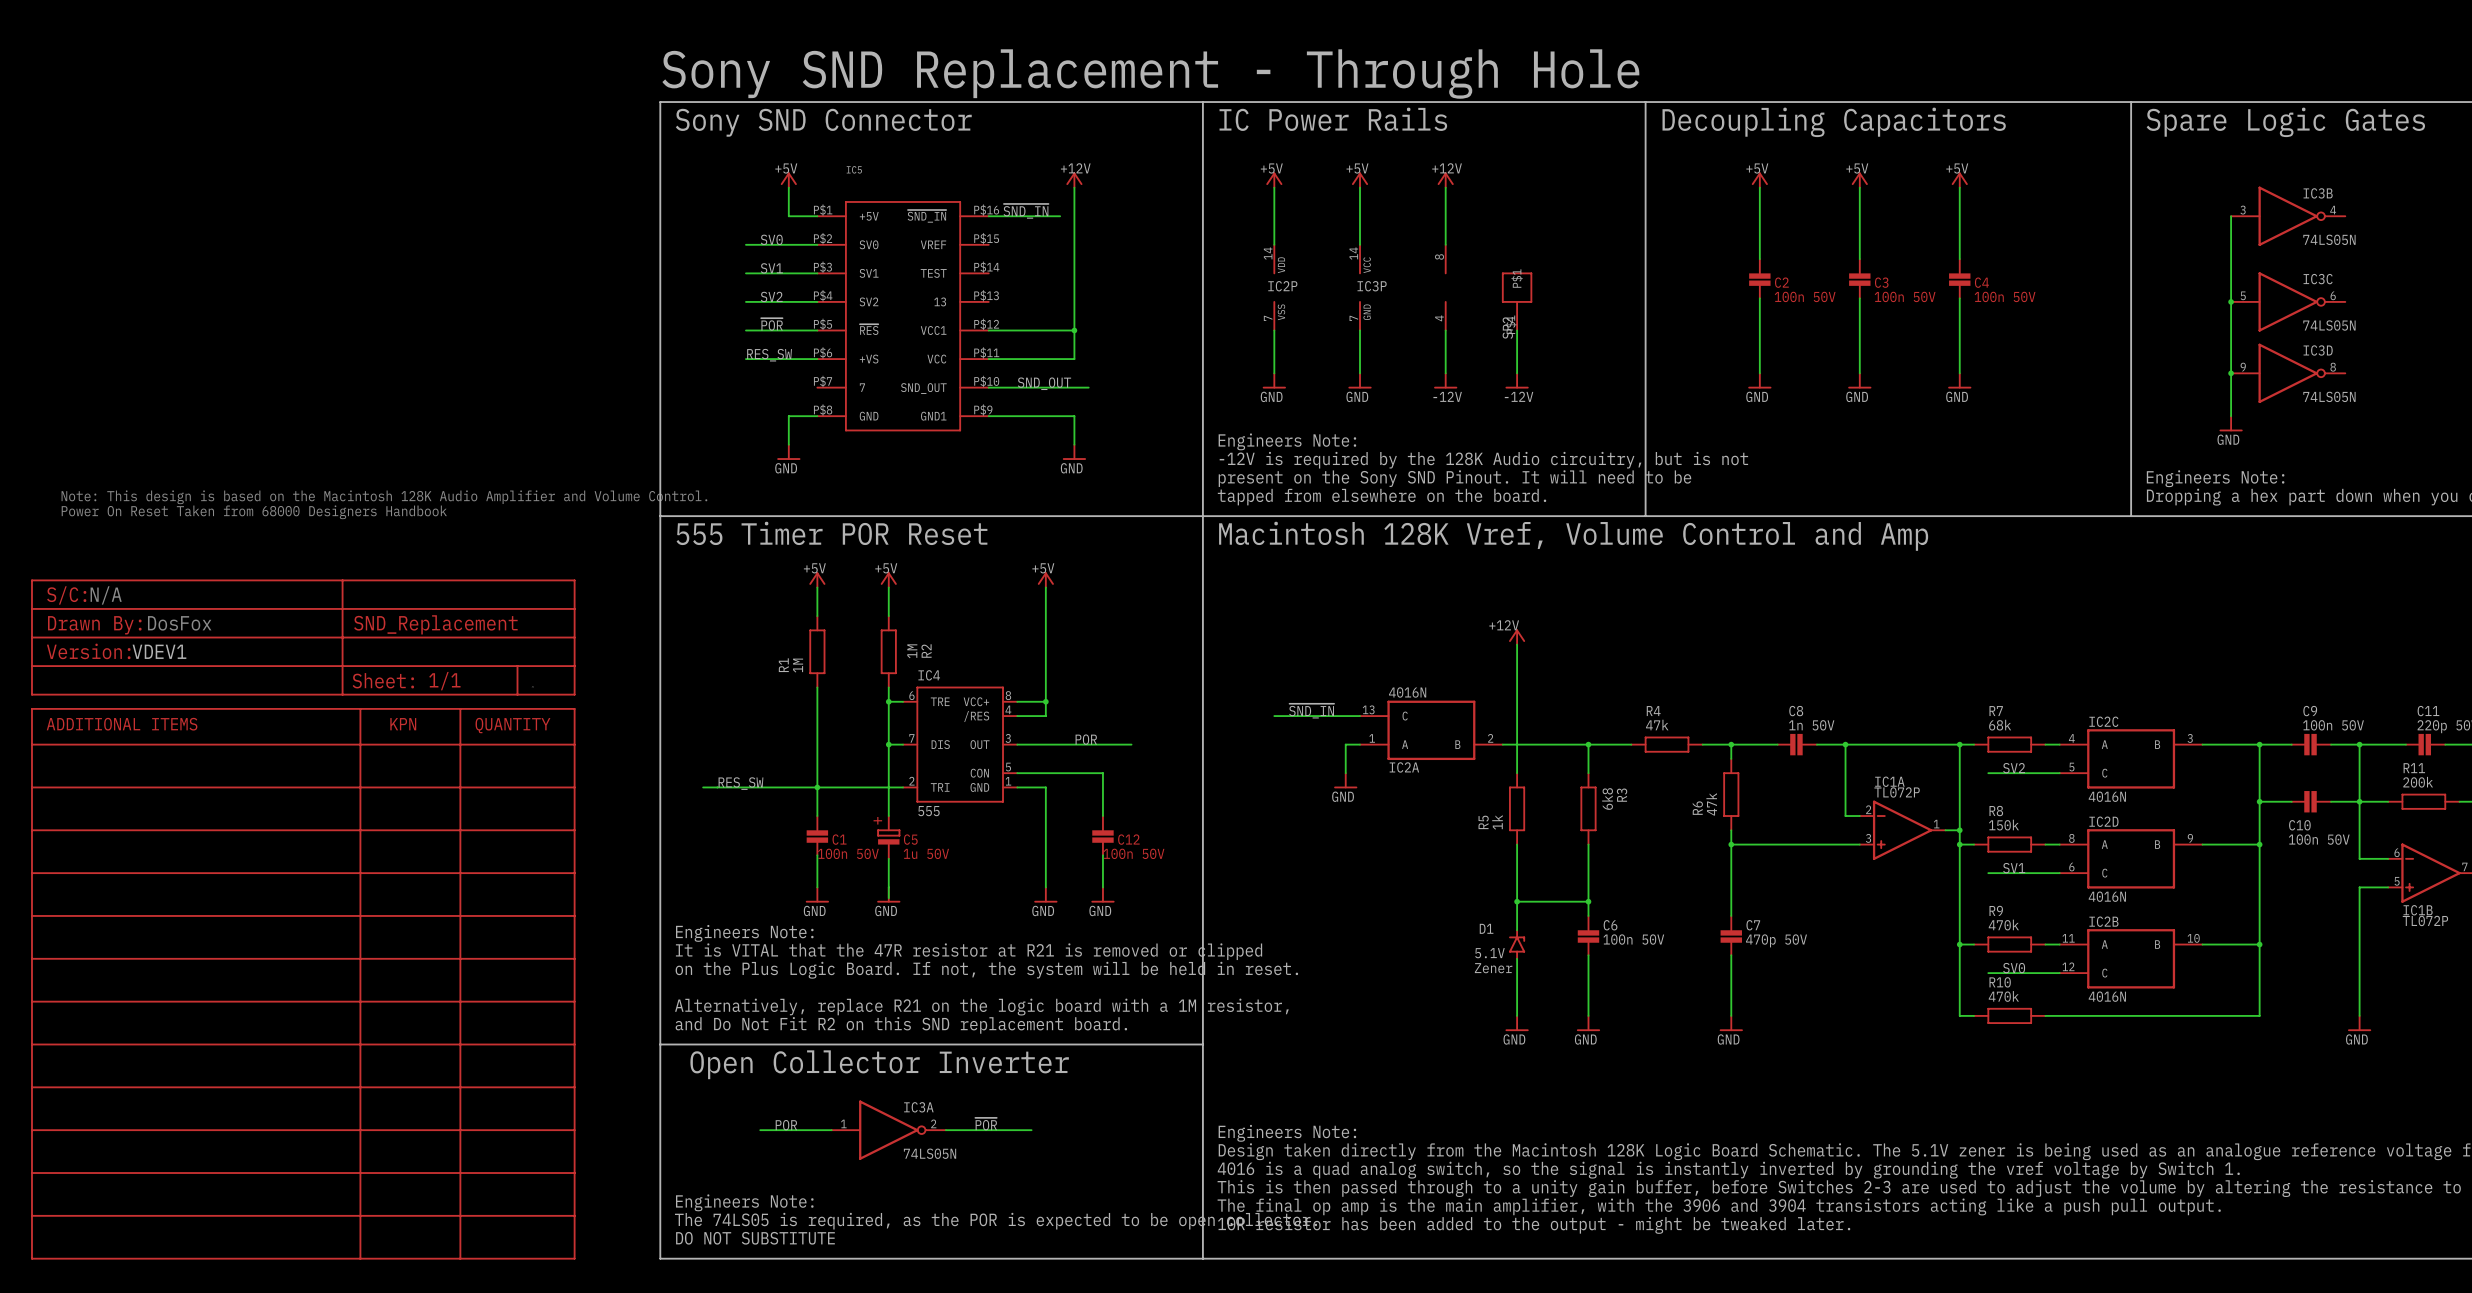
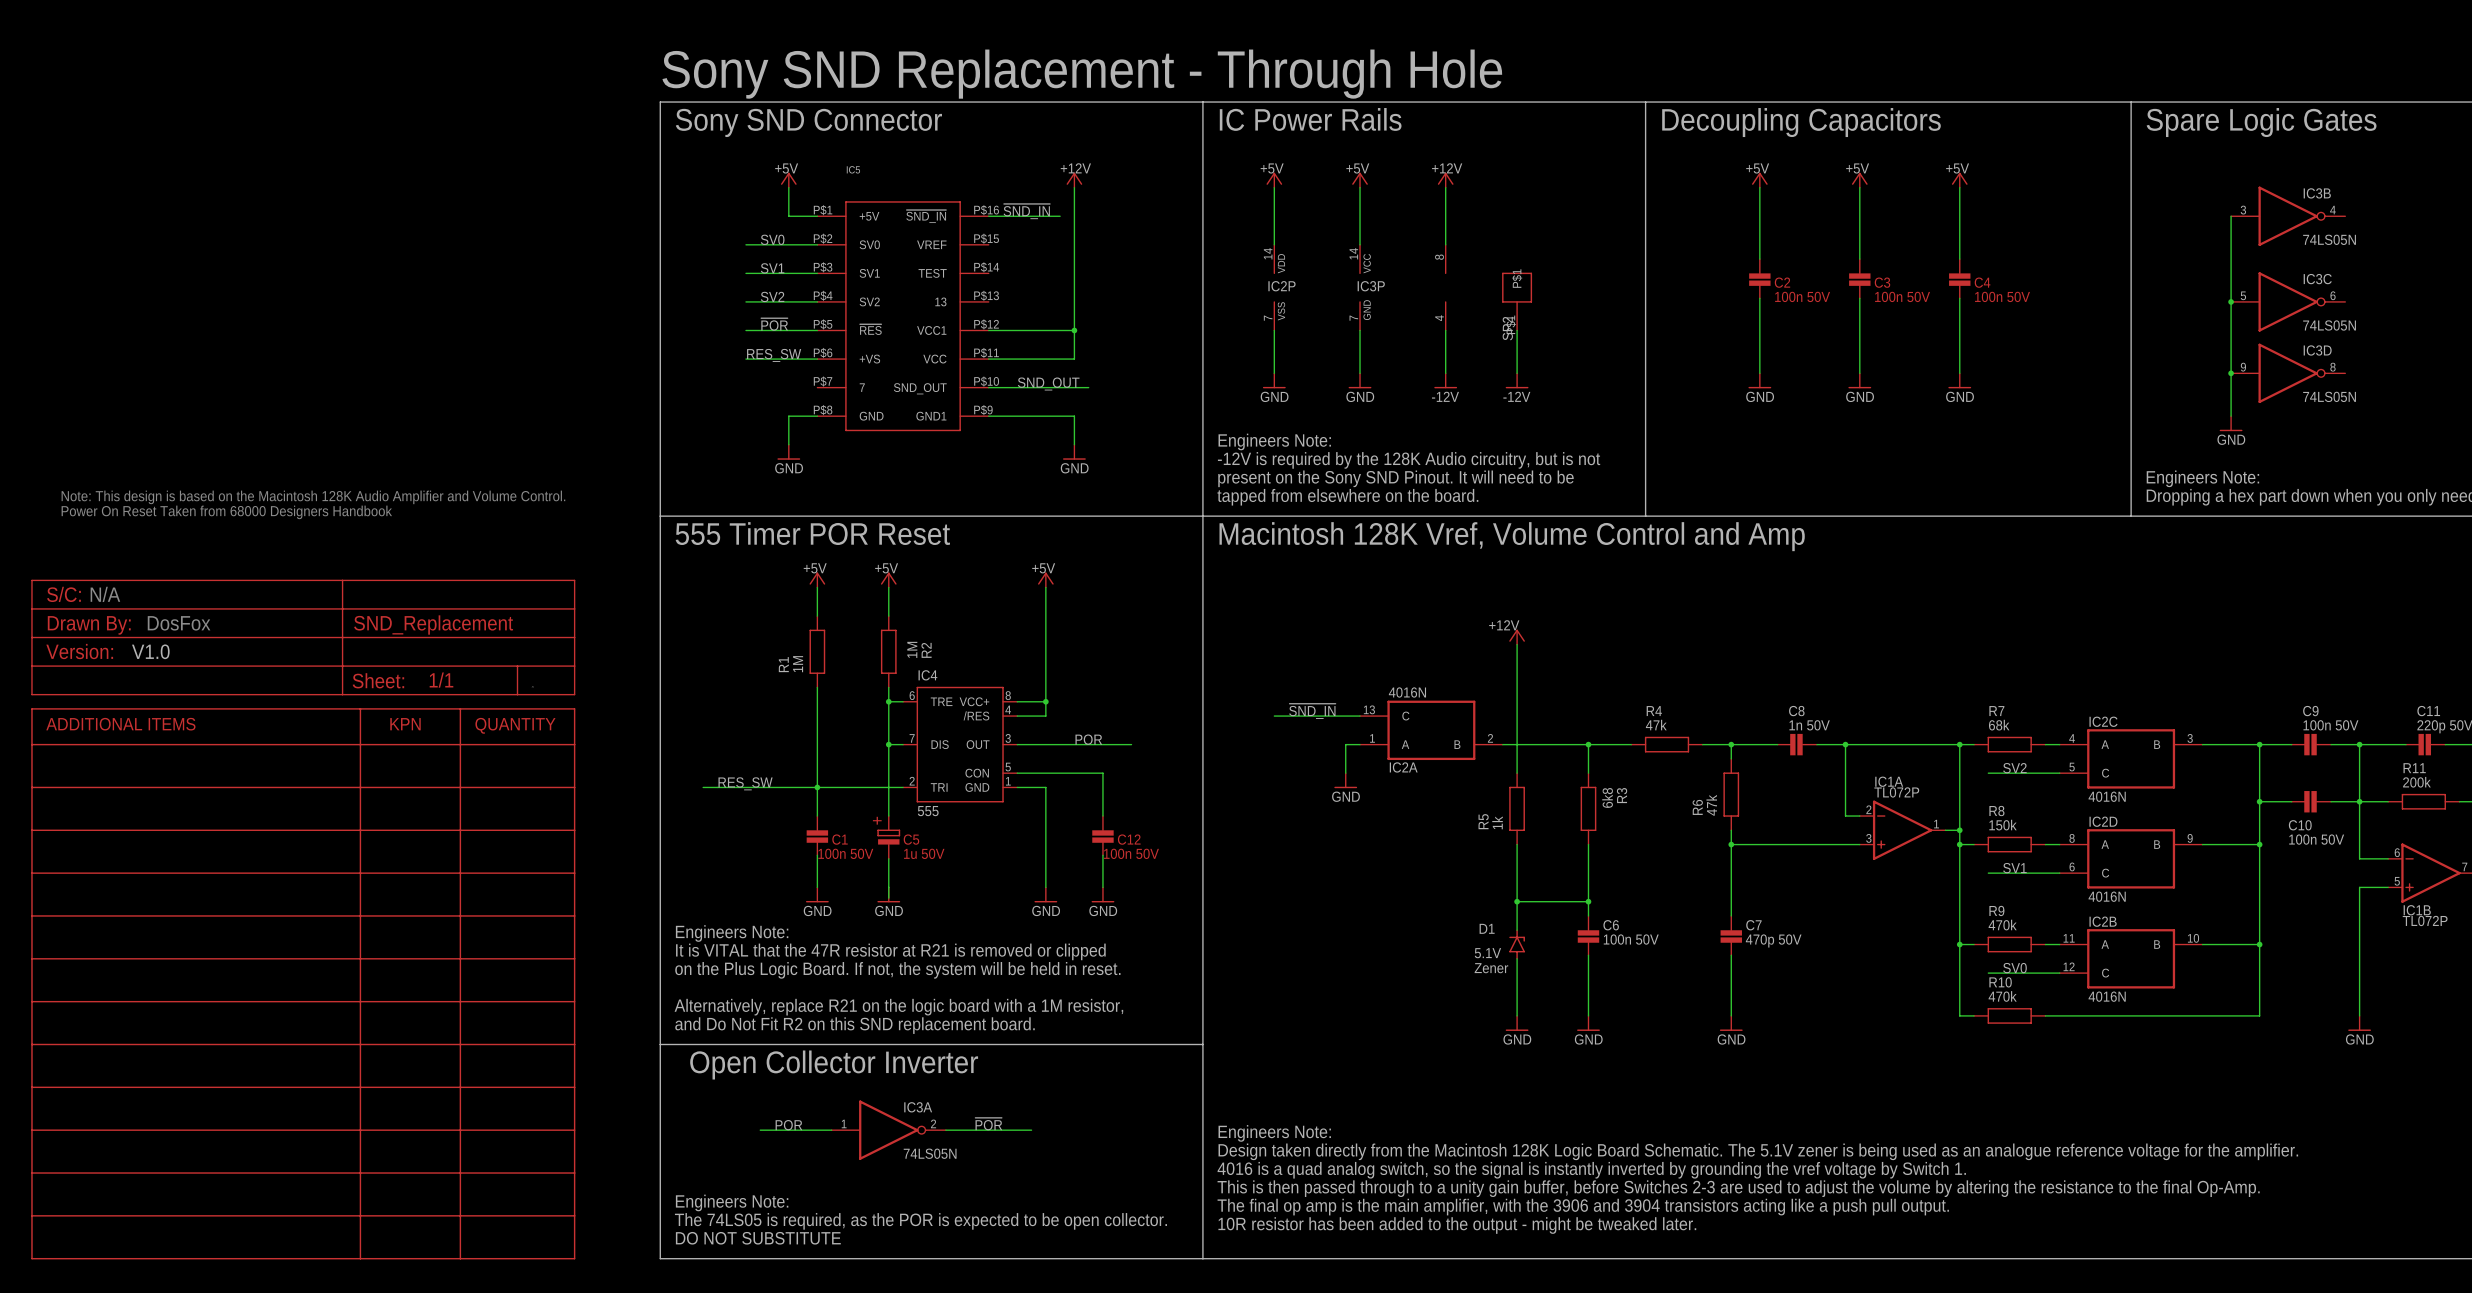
part value: VDEV1 (159, 651) -> V1.0 (150, 651)

